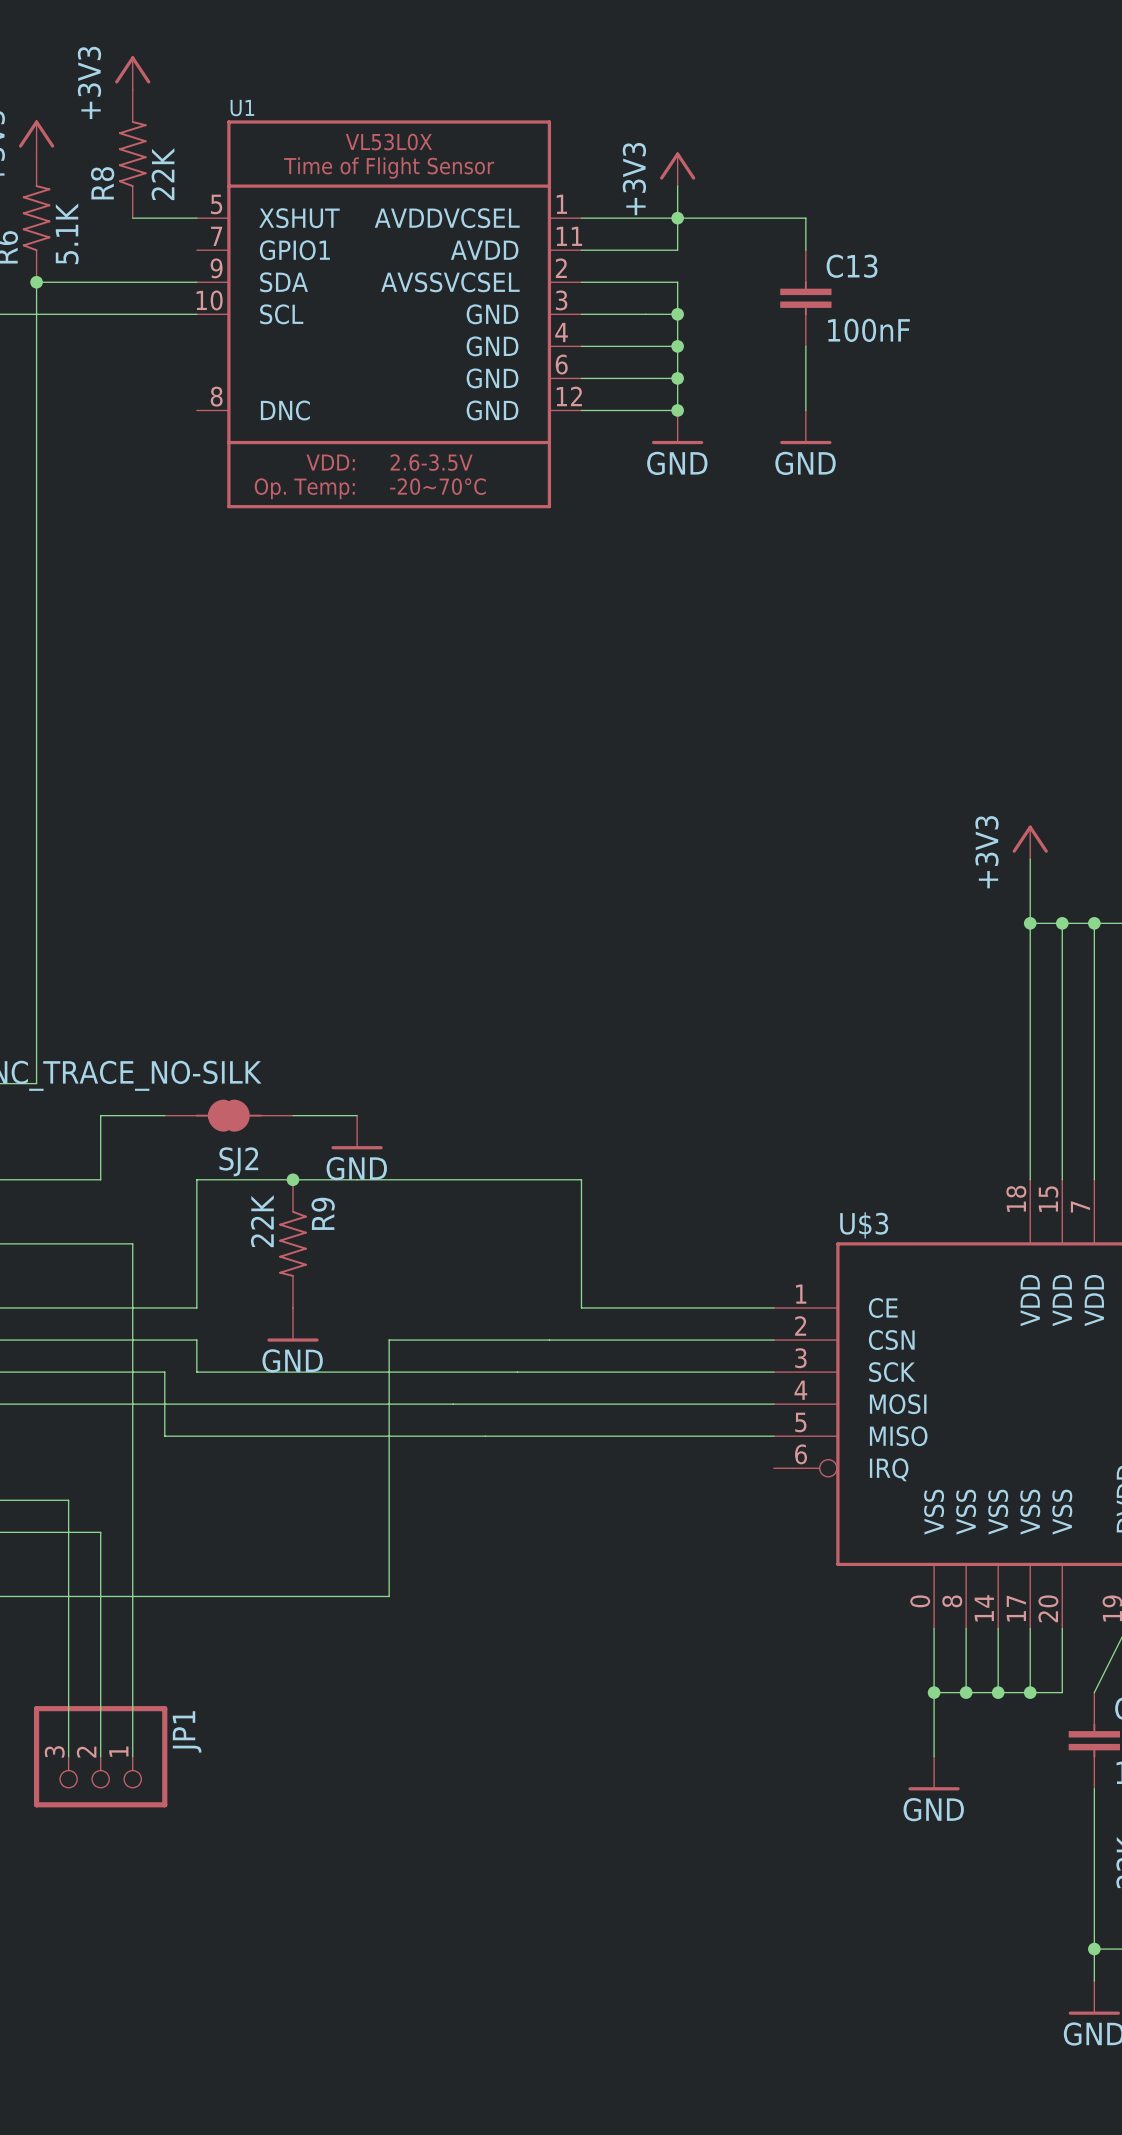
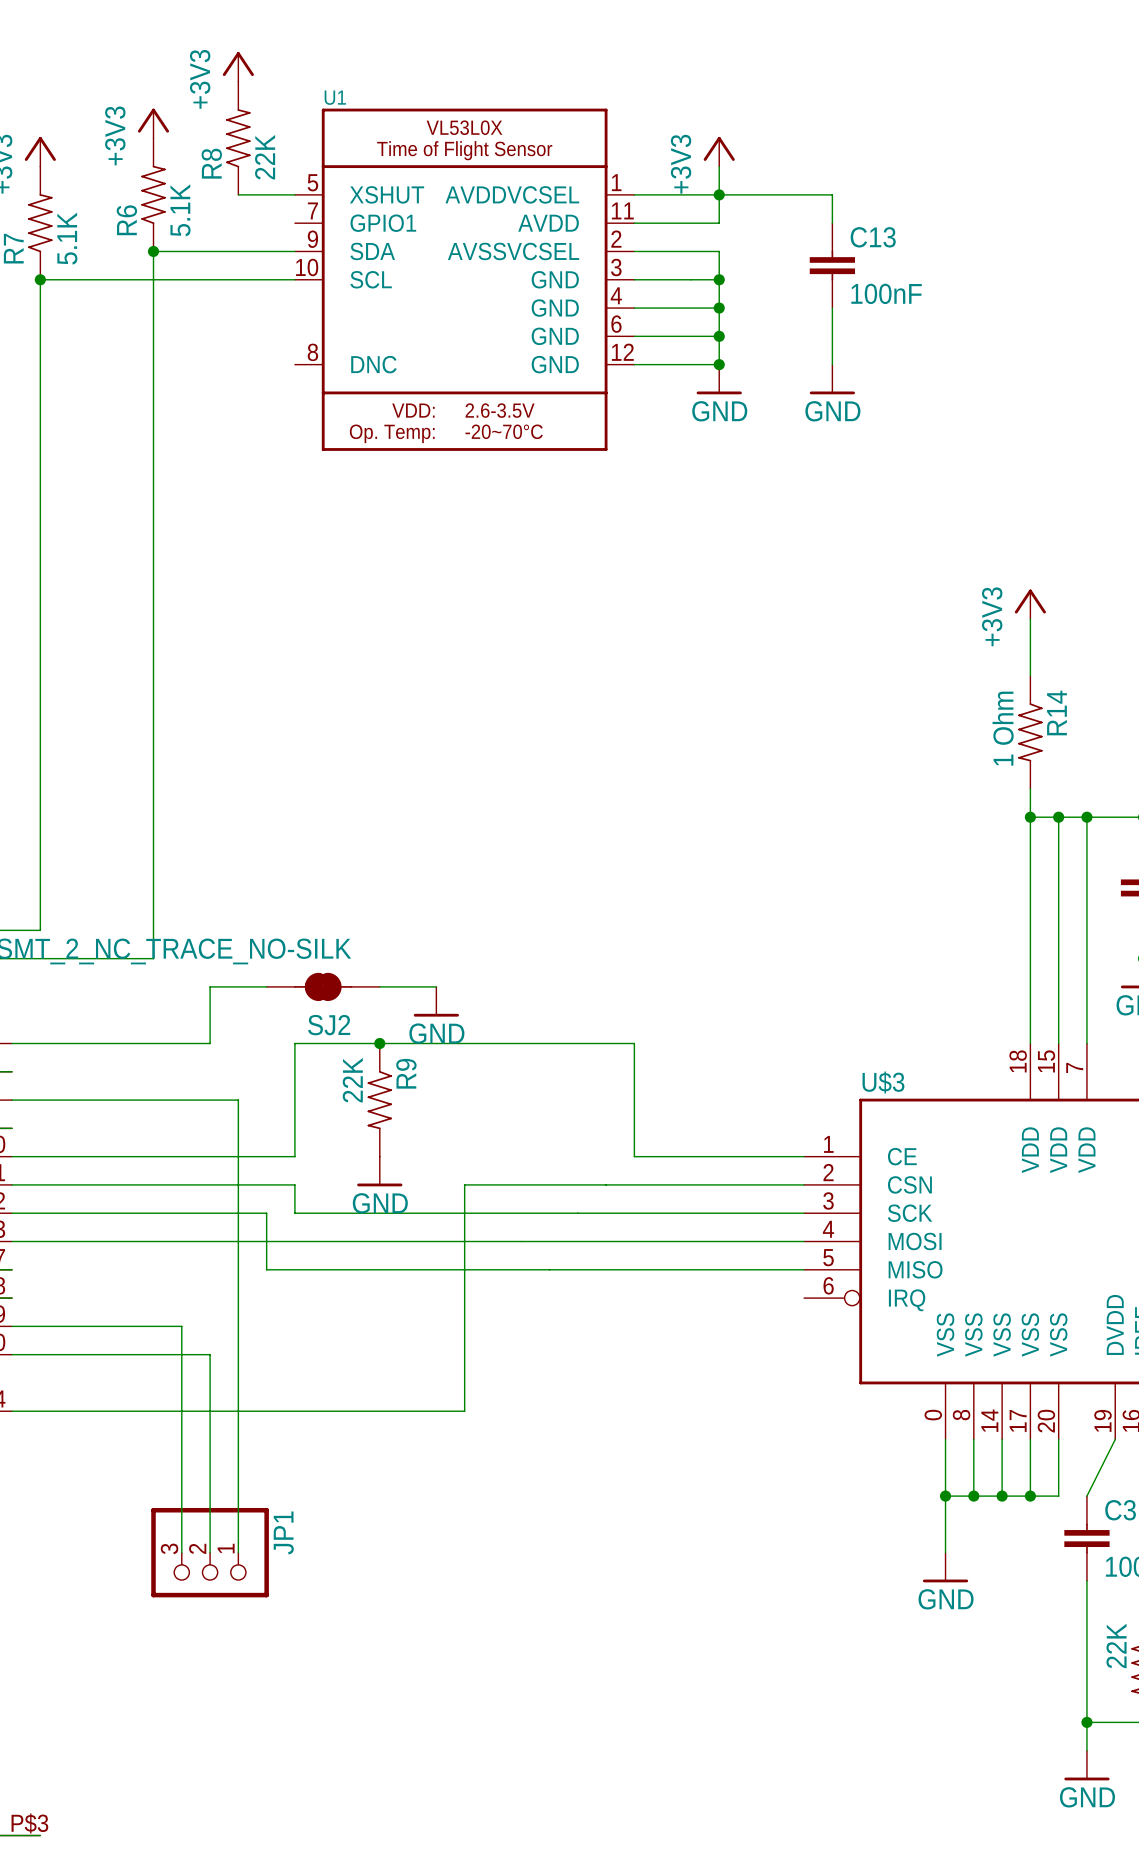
wire: none -> (1030, 619) (1030, 675)
R14: none -> 1 Ohm (1030, 732)
power symbol position: +3V3 (1030, 842) -> +3V3 (1030, 604)

